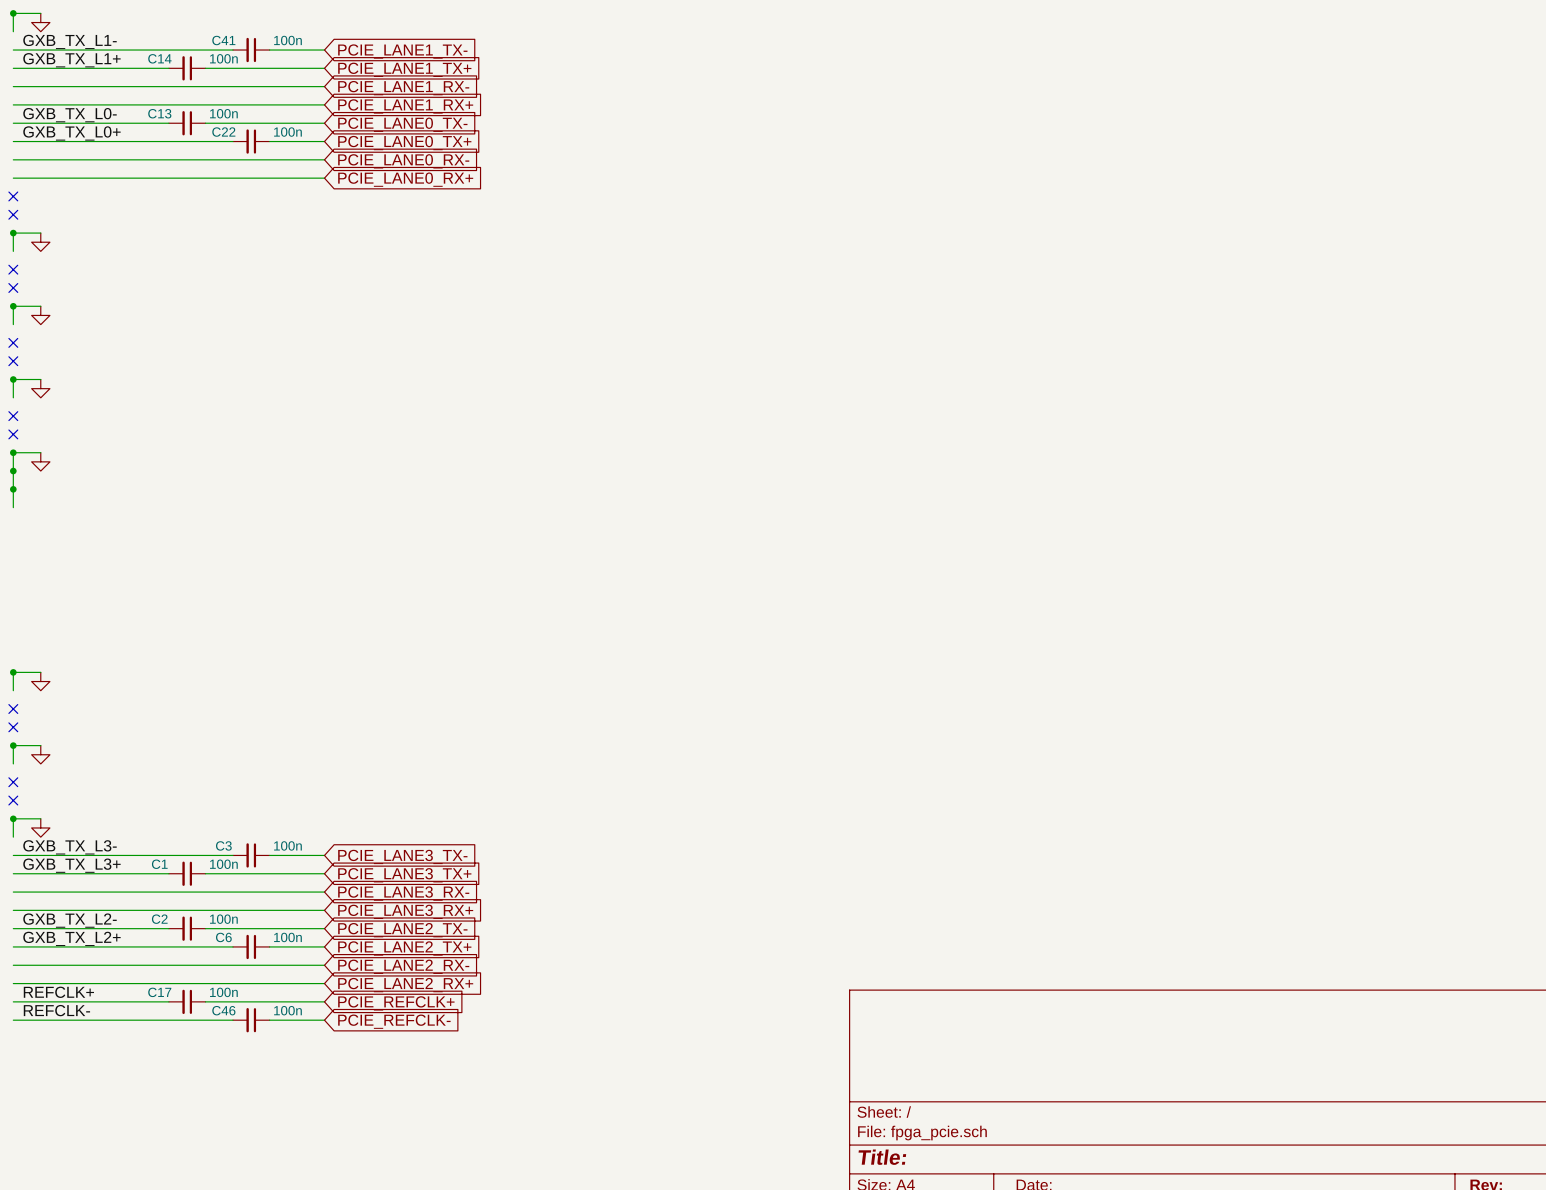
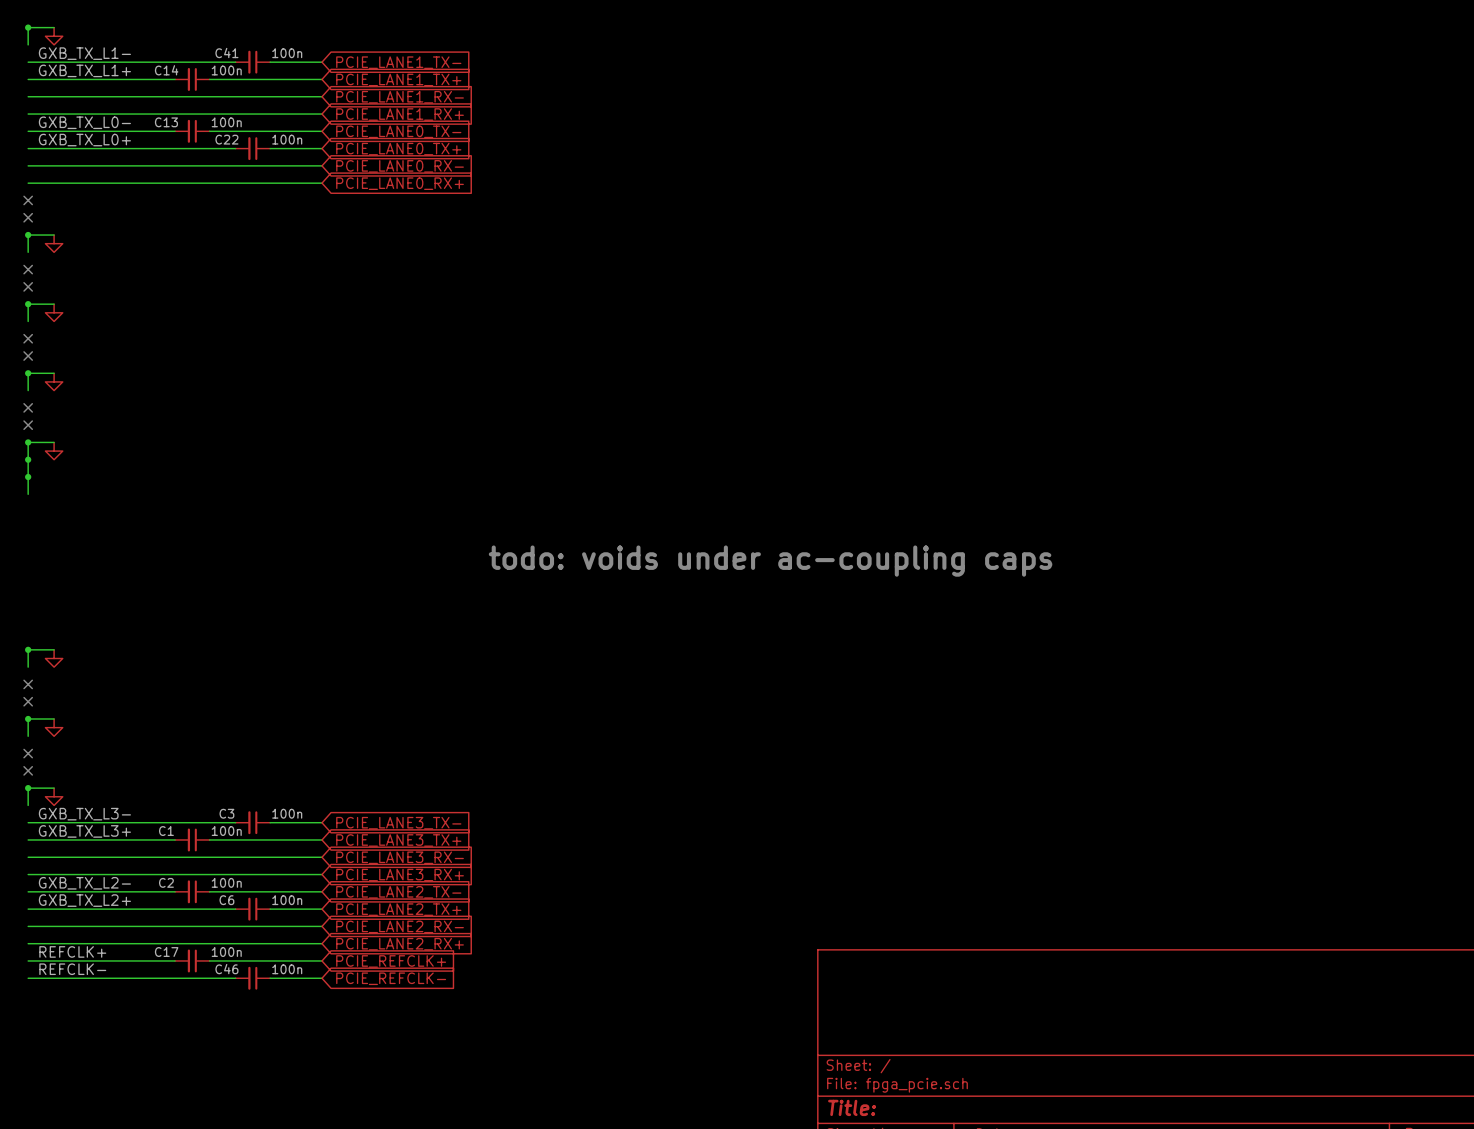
text: none -> todo: voids under ac-coupling caps (770, 561)

